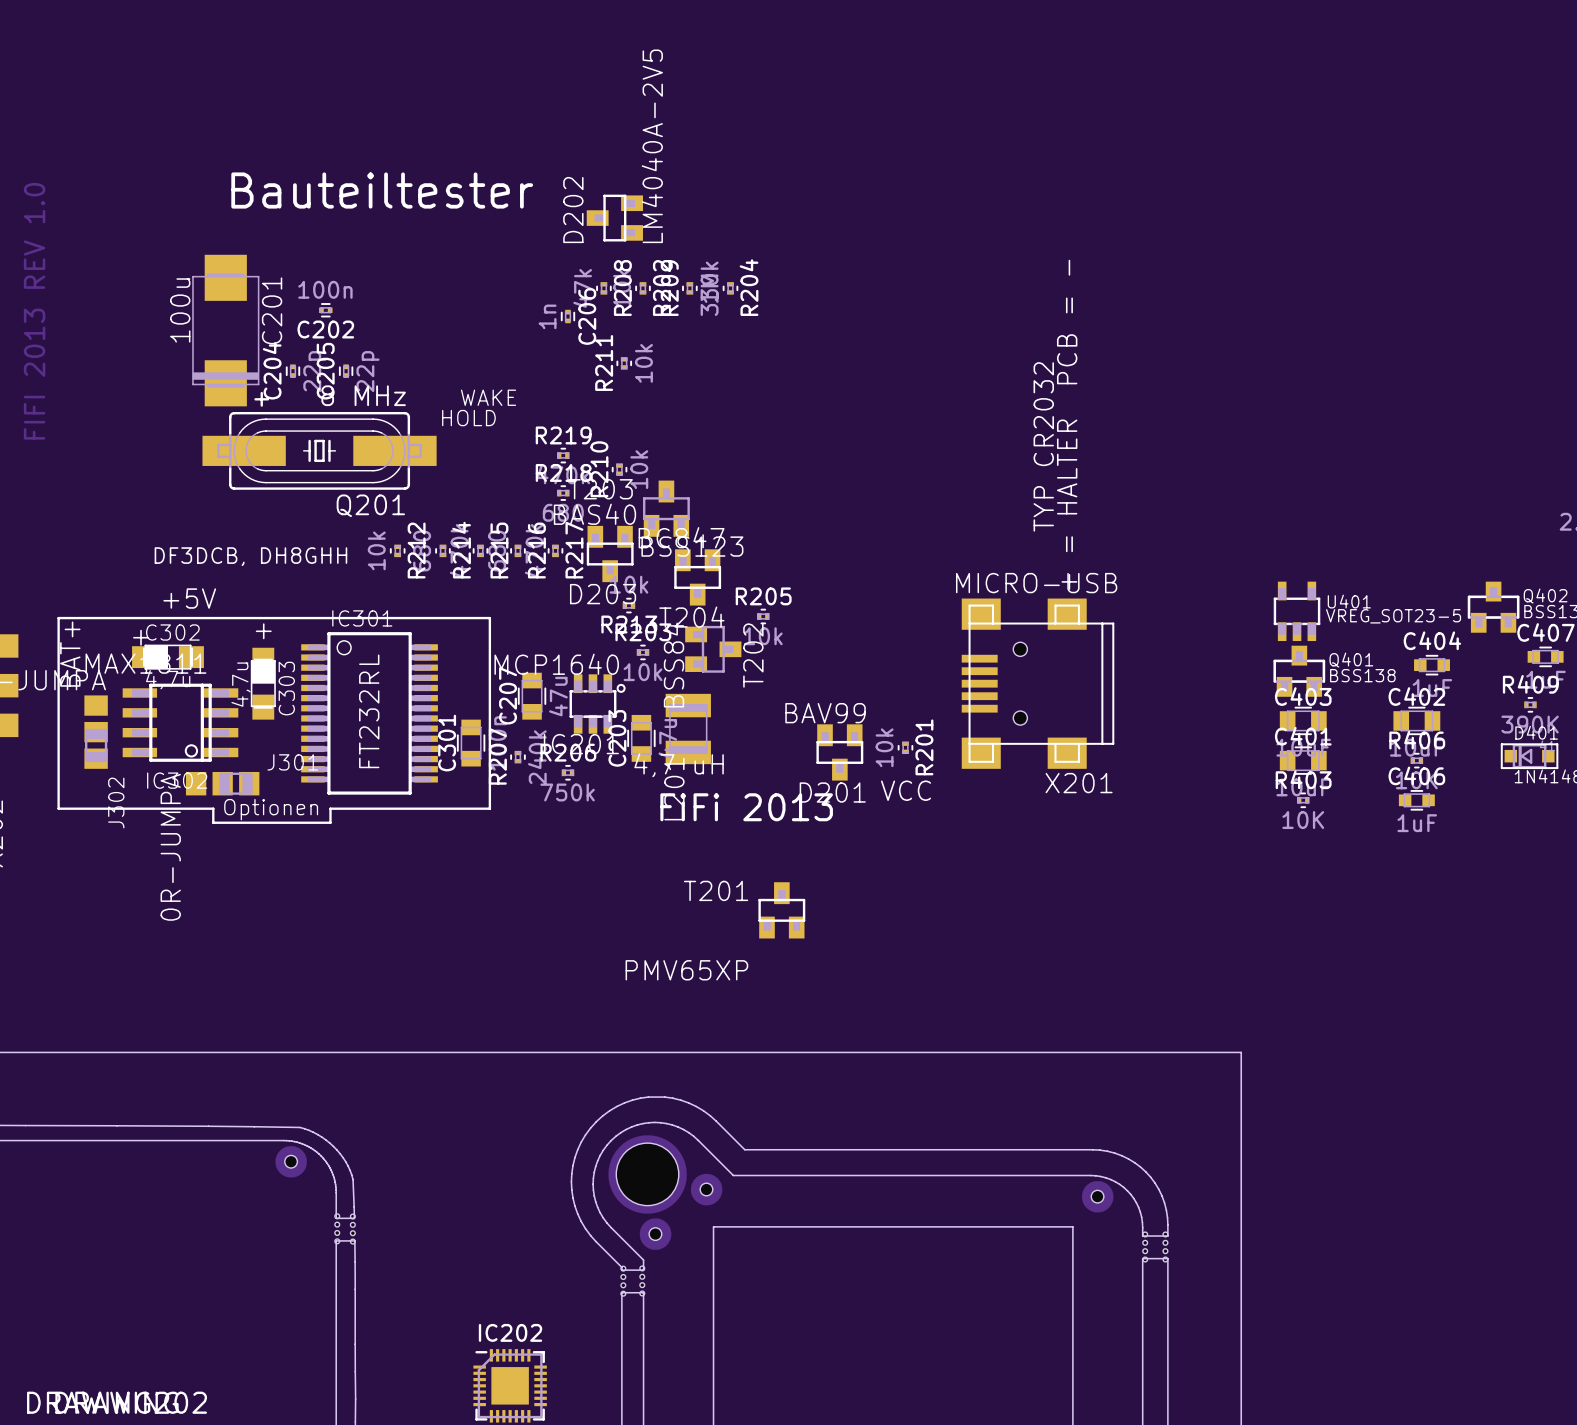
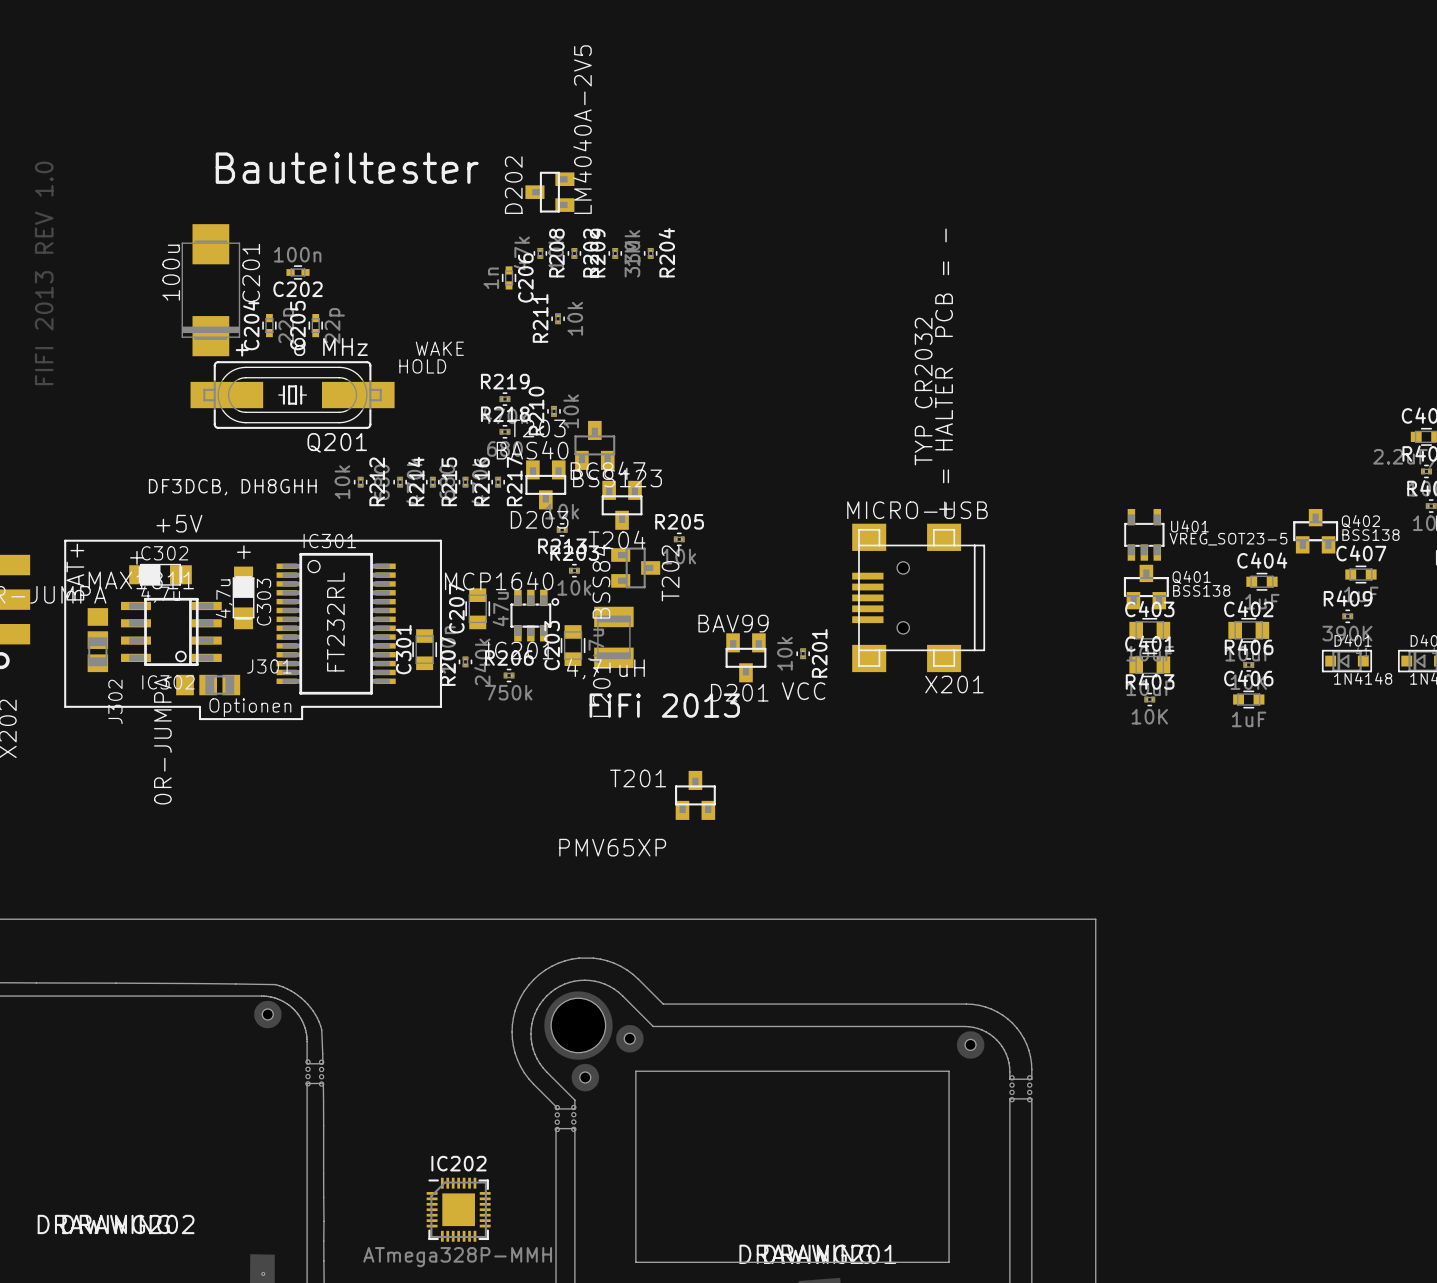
C202 footprint: [319, 303, 333, 318] -> [286, 265, 310, 280]
C206 footprint: [560, 309, 576, 324] -> [501, 266, 517, 290]
C204 footprint: [285, 364, 301, 378] -> [262, 314, 277, 338]
C205 footprint: [338, 364, 354, 378] -> [308, 314, 323, 338]

